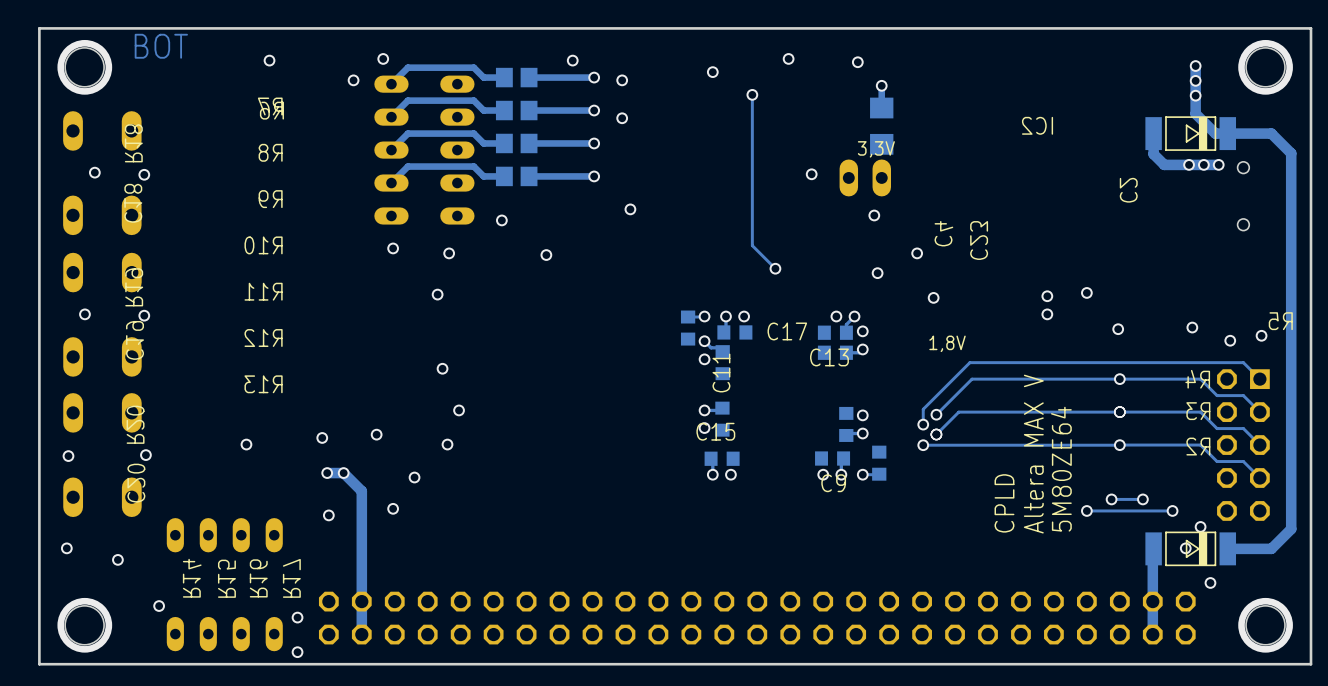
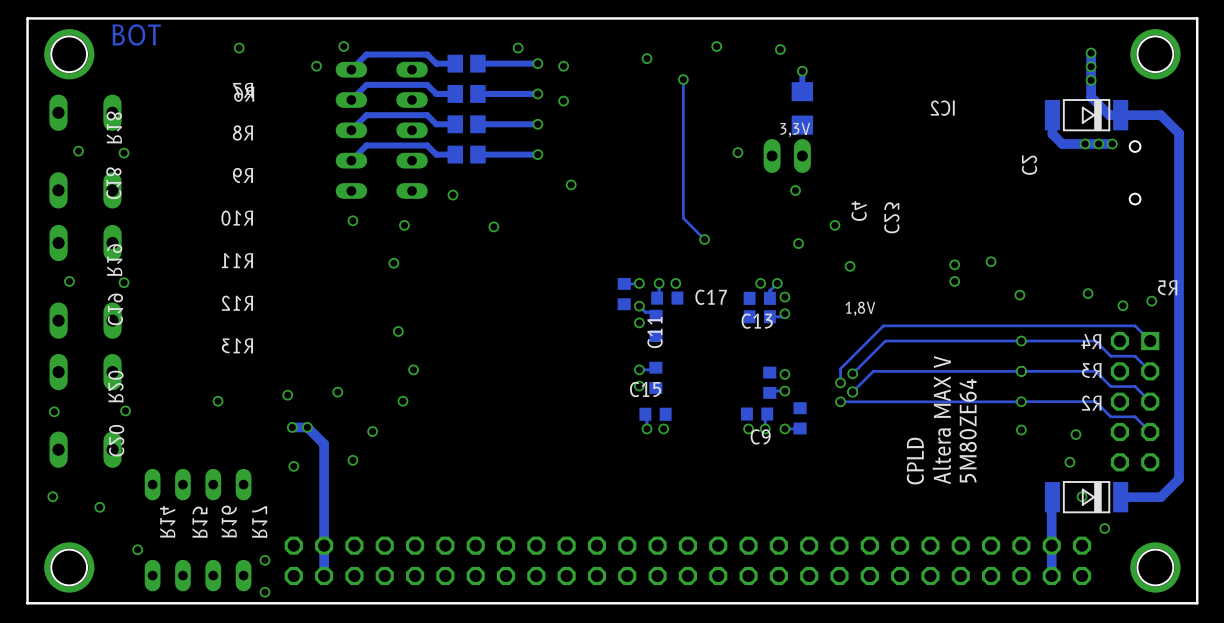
via: none -> (1021, 430)
via: none -> (1075, 434)
via: (1111, 499) -> none
track: (1142, 499) (1111, 499) -> none
via: (1142, 499) -> none
via: (1086, 510) -> none
track: (1172, 510) (1086, 510) -> none
via: (1200, 526) -> none

